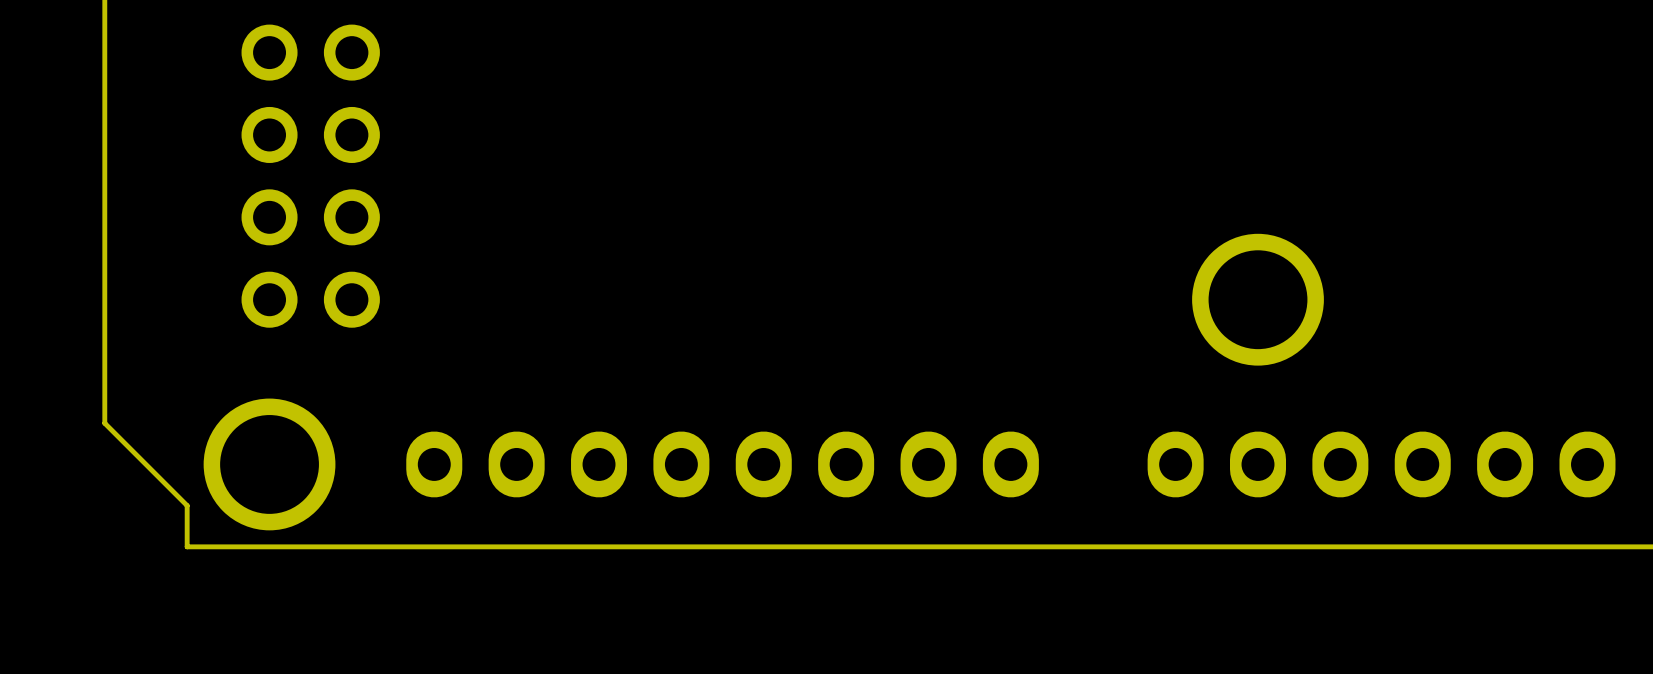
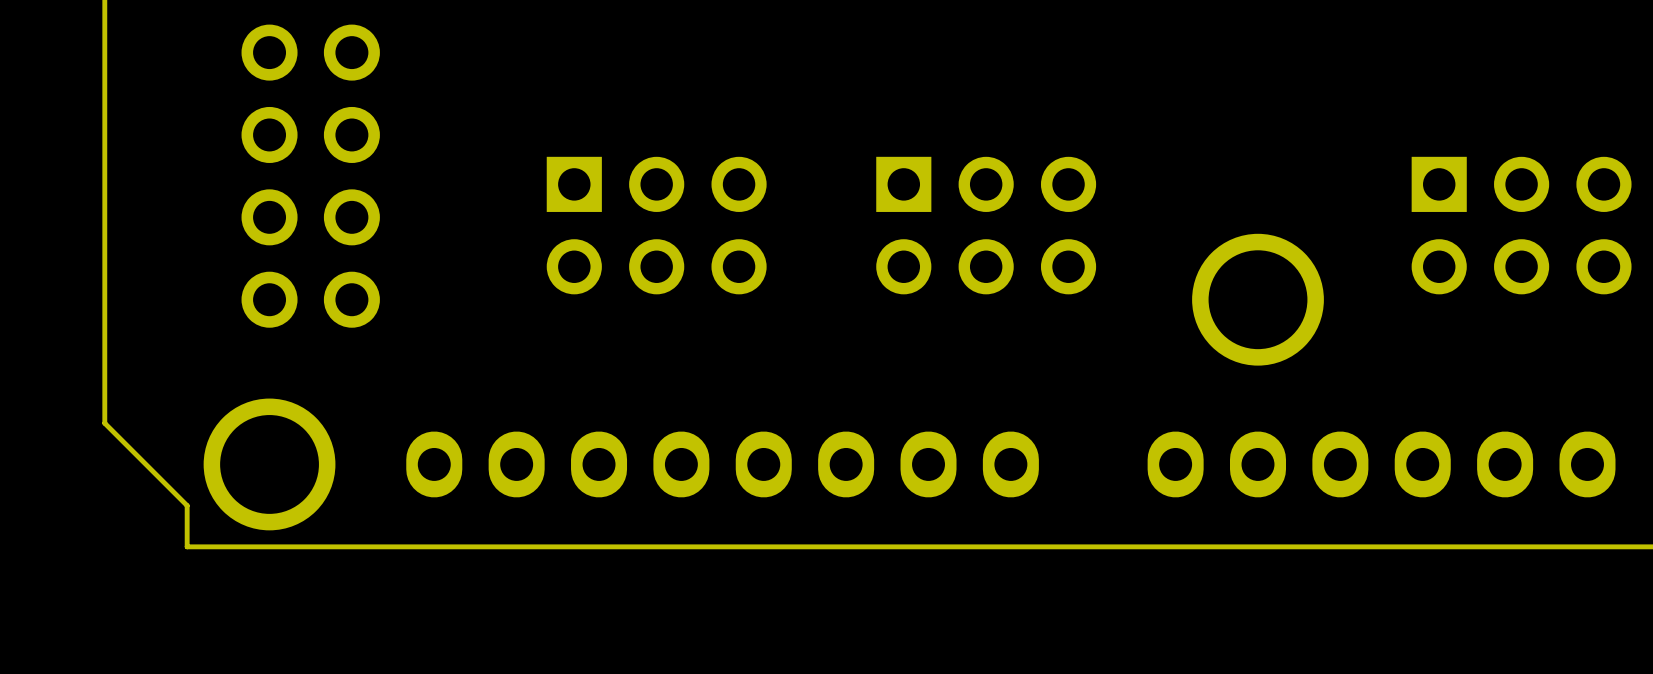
part: none -> (656, 225)
part: none -> (986, 225)
part: none -> (1521, 225)

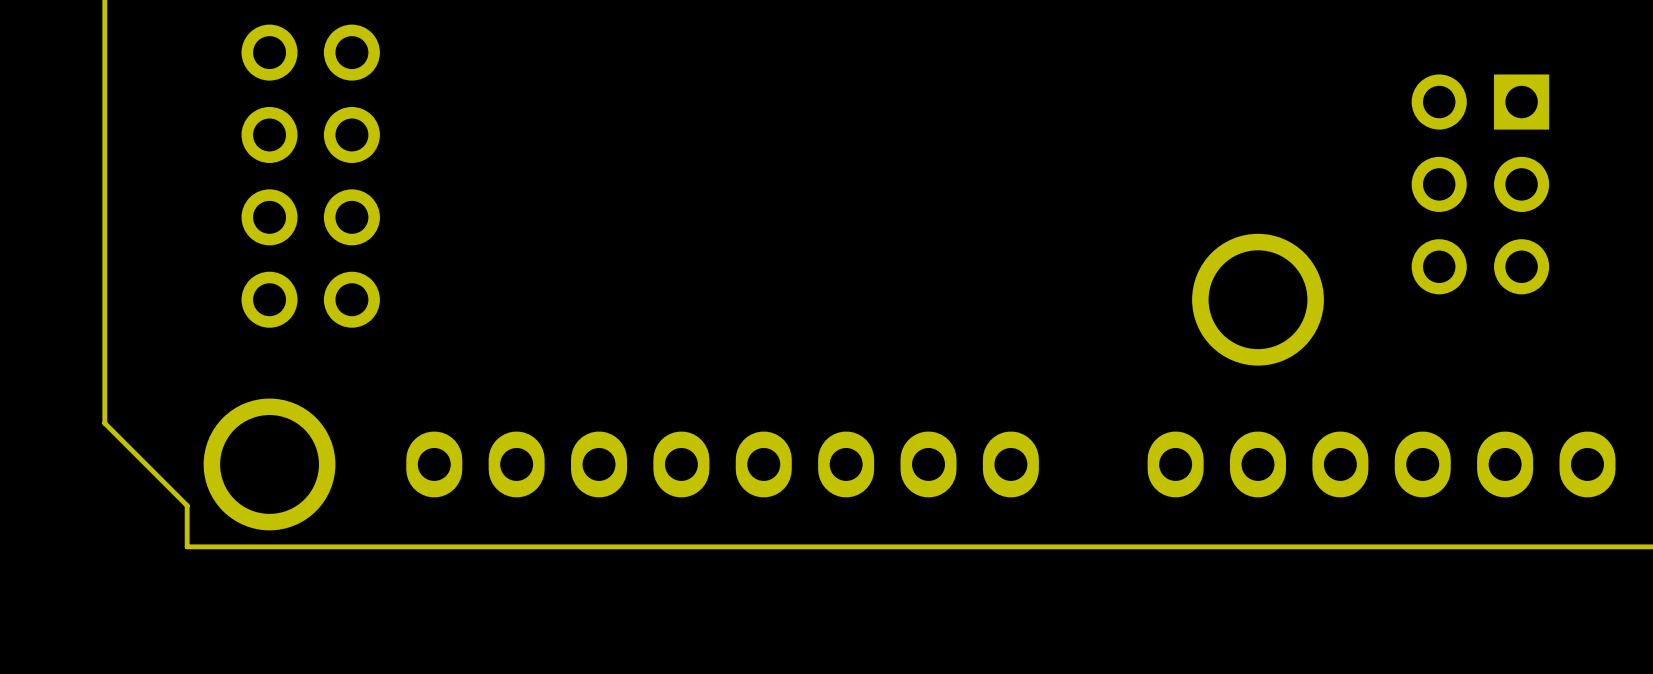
part: (656, 225) -> none
part: (986, 225) -> none
part rotation: 0° (1521, 225) -> 90° clockwise (1480, 184)

